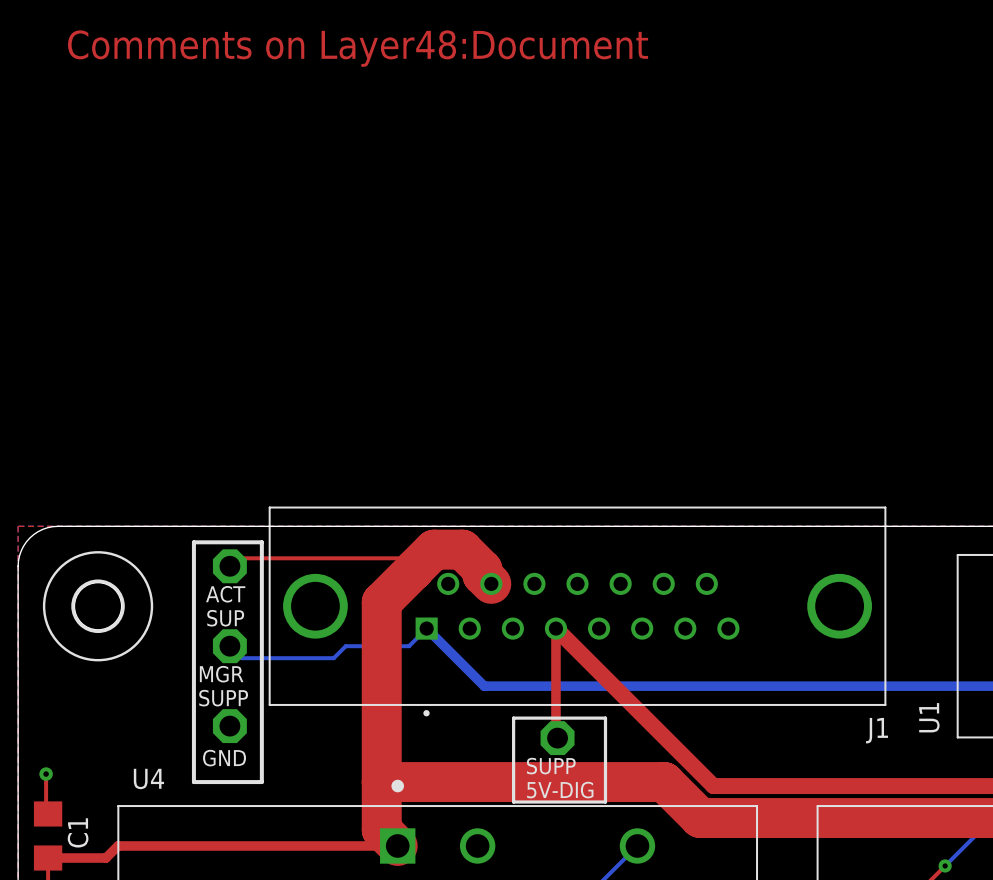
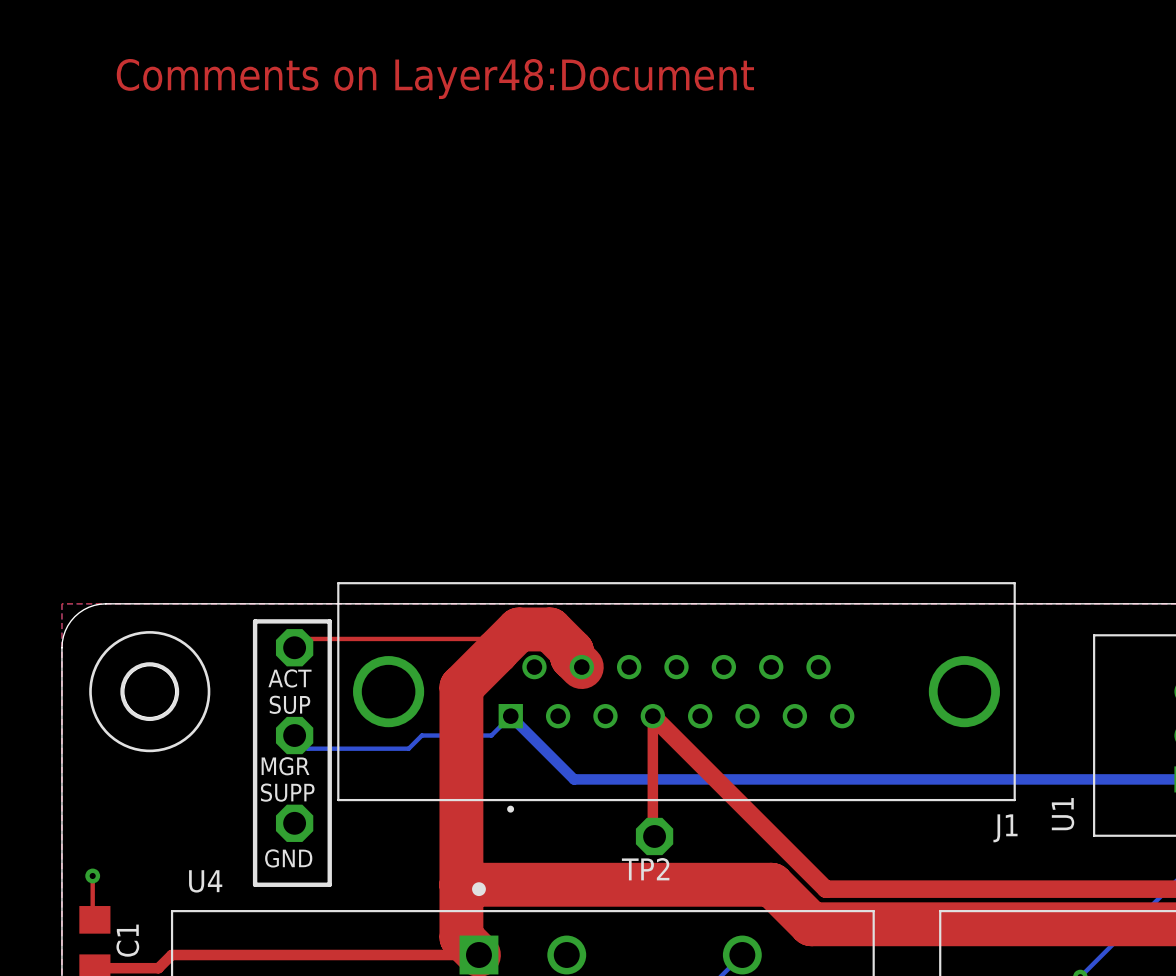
line: (513, 718) (513, 802) (605, 802) (605, 718) (513, 718) -> none
text: SUPP (551, 766) -> none
TP2 name: none -> TP2 (645, 869)
text: 5V-DIG (560, 790) -> none

